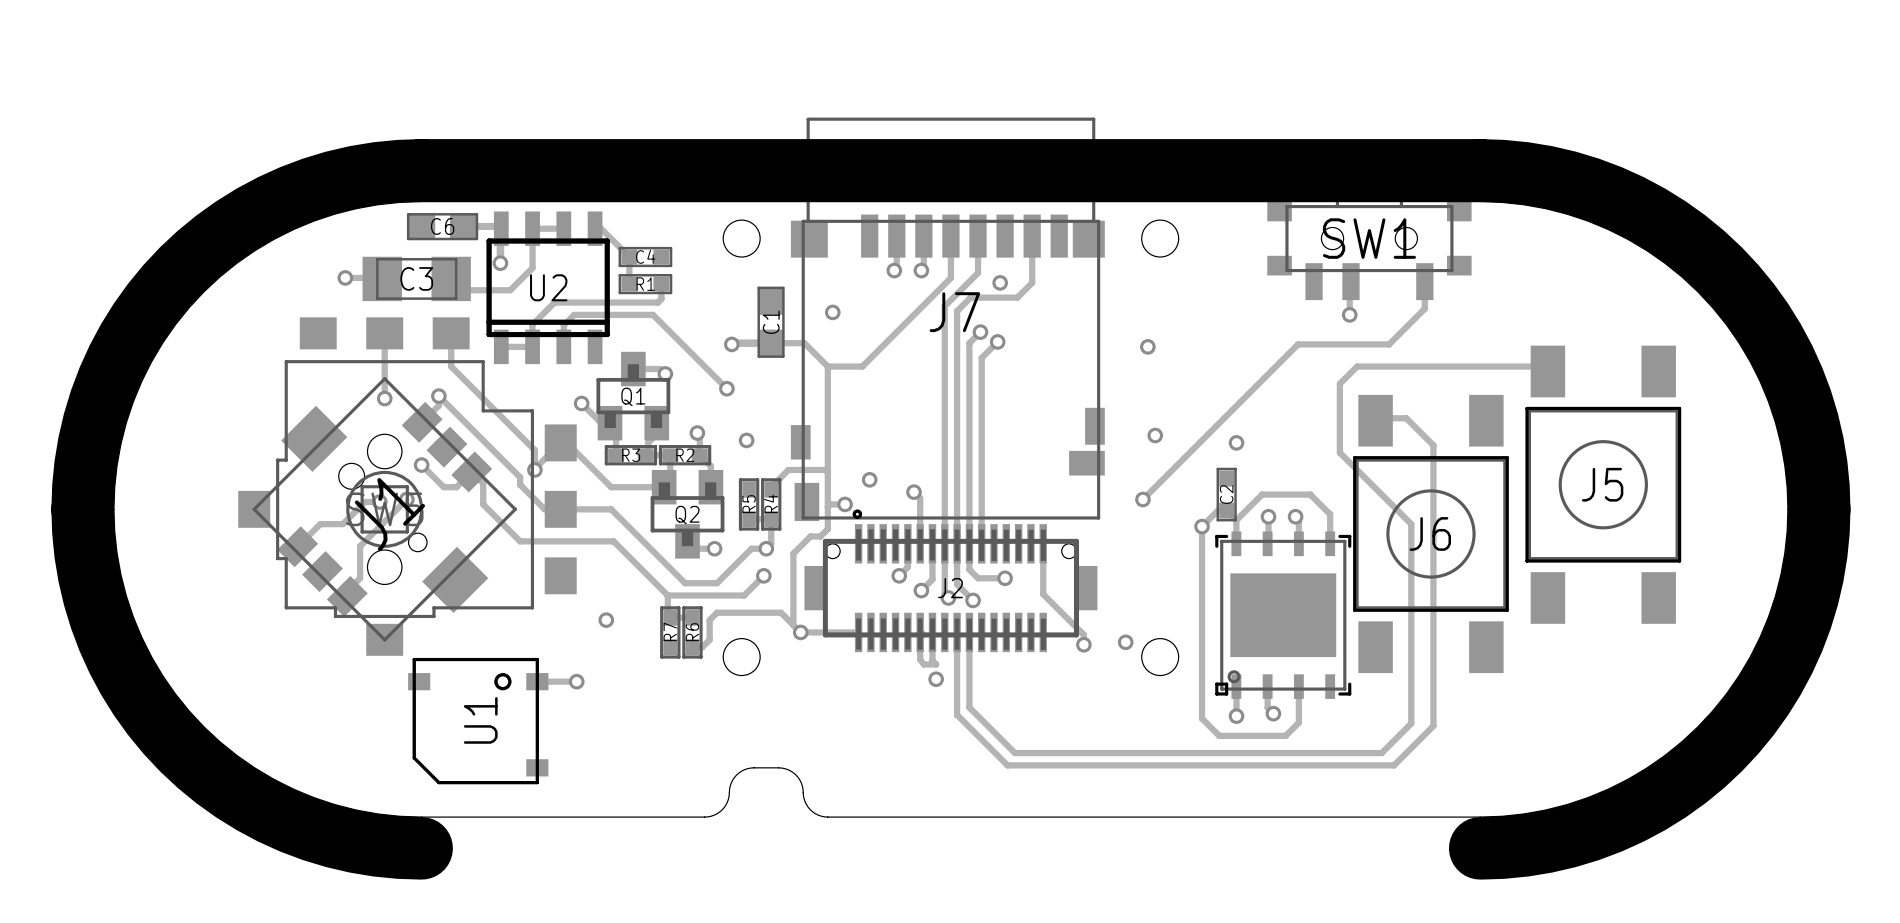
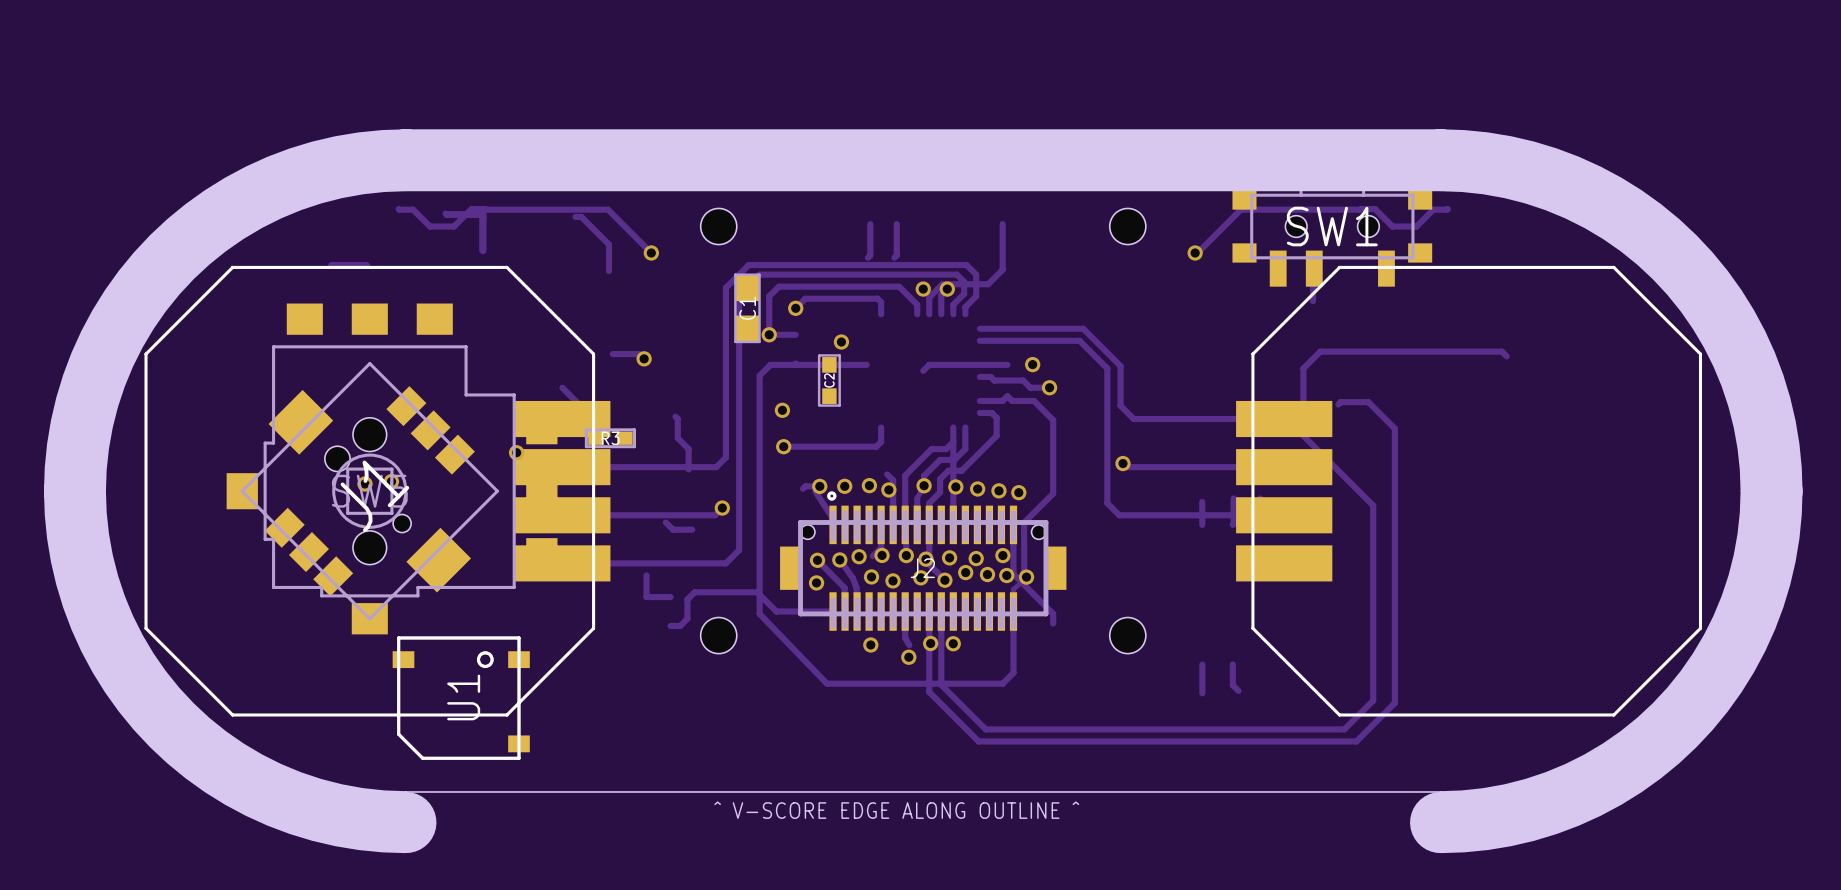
track: none -> (398, 209) (413, 209) (429, 226) (454, 226) (471, 209) (608, 209) (651, 252)
track: none -> (1447, 209) (1433, 209) (1416, 226) (1392, 226) (1375, 209) (1240, 209) (1197, 252) (1195, 252)
C6: (442, 226) -> none
track: (563, 228) (532, 228) (532, 267) (510, 290) (469, 290) (451, 278) -> none
track: (950, 236) (950, 277) (862, 366) (827, 366) -> none
track: (978, 236) (978, 273) (944, 306) (944, 318) -> (795, 334) (769, 334) (769, 296) (778, 286) (899, 286) (917, 304)
C4: (645, 257) -> none
via: (500, 263) -> none
via: none -> (651, 252)
via: none -> (1195, 252)
via: (894, 270) -> none
via: (921, 270) -> none
via: (345, 277) -> none
C3: (416, 278) -> none
track: (1424, 281) (1424, 308) (1389, 344) (1298, 344) (1142, 499) -> none
via: (1000, 282) -> none
R1: (645, 284) -> none
track: (661, 284) (661, 299) (657, 302) (554, 302) (532, 324) (532, 346) -> none
U2: (548, 287) -> none
via: none -> (923, 289)
track: none -> (947, 289) (941, 295) (941, 314)
via: none -> (947, 289)
via position: (832, 312) -> (795, 308)
via: (1349, 314) -> none
J7: (947, 319) -> none
track: none -> (795, 308) (805, 298) (877, 298) (881, 302) (881, 314)
track: (944, 328) (944, 516) -> (965, 427) (965, 449) (954, 459) (940, 459) (924, 475) (924, 485) (917, 498)
track: (957, 328) (957, 521) -> (979, 413) (991, 413) (996, 417) (996, 435) (961, 470) (948, 470) (940, 479) (940, 492) (929, 503)
track: none -> (965, 314) (965, 307) (976, 296) (976, 274) (966, 265) (748, 265) (725, 287) (725, 457) (716, 467) (562, 467)
track: (980, 332) (969, 343) (969, 569) (978, 578) (1005, 578) -> none
via: (980, 332) -> none
track: (384, 333) (384, 398) -> none
track: (451, 333) (451, 366) (534, 450) (534, 469) -> none
track: (997, 341) (981, 357) (981, 444) -> none
via: (997, 341) -> none
track: none -> (979, 328) (1083, 328) (1120, 366) (1120, 405) (1133, 419) (1284, 419)
track: (731, 344) (804, 343) (827, 366) -> none
via: (731, 344) -> none
track: (501, 346) (532, 346) -> none
track: (563, 346) (563, 325) (574, 314) (653, 314) (726, 388) -> none
via: (1147, 346) -> none
via: none -> (769, 334)
track: none -> (979, 340) (1079, 340) (1107, 368) (1107, 503) (1119, 515) (1284, 515)
via: none -> (841, 342)
track: (827, 366) (827, 529) (820, 536) (810, 536) (793, 553) (793, 625) -> none
via: none -> (1032, 364)
track: none -> (866, 364) (770, 364) (759, 375) (759, 613) (827, 683) (1002, 683) (1013, 672) (1013, 589) (1026, 577) (1024, 575) (1024, 522) (1053, 493) (1053, 420) (1033, 400) (1012, 400) (1007, 396) (1002, 400) (979, 400)
track: none -> (1007, 364) (929, 364) (923, 370)
via: (726, 388) -> none
track: none -> (979, 376) (990, 376) (994, 380) (1023, 380) (1030, 387) (1049, 387)
via: (438, 396) -> none
Q1: (633, 396) -> none
via: (384, 398) -> none
via: (581, 403) -> none
via: none -> (1049, 387)
track: (422, 422) (438, 405) (438, 396) (520, 477) (520, 484) (544, 509) (611, 509) (685, 583) -> (562, 563) (663, 563)
track: (656, 423) (656, 434) (648, 442) (648, 452) (645, 455) (670, 455) (670, 481) (664, 487) (611, 487) (566, 442) (560, 442) (534, 468) -> none
via: none -> (782, 410)
via: (697, 433) -> none
via: (1155, 435) -> none
via: (746, 440) -> none
via: (1236, 442) -> none
track: none -> (881, 427) (881, 441) (876, 446) (783, 446)
R2: (685, 455) -> none
track: none -> (953, 441) (946, 449) (931, 449) (905, 475) (906, 555)
via: none -> (783, 446)
track: (421, 465) (443, 487) (456, 487) (471, 471) (483, 483) (483, 504) (520, 541) (613, 541) (667, 595) (744, 595) (763, 575) -> none
via: (421, 465) -> none
C2 footprint: [1216, 467, 1237, 522] -> [817, 354, 842, 407]
track: (827, 472) (825, 469) (788, 469) (771, 487) (771, 489) -> none
via: (869, 479) -> none
track: none -> (1122, 463) (1126, 467) (1284, 467)
J5: (1603, 484) -> none
via: (914, 492) -> none
track: (406, 499) (360, 546) (360, 578) (347, 591) (347, 596) -> none
via position: (1142, 499) -> (1122, 463)
track: (379, 501) (365, 501) (342, 524) (320, 524) (297, 546) -> none
via: none -> (869, 485)
via: none -> (924, 485)
R5: (749, 504) -> none
R4: (771, 504) -> none
via: none -> (844, 486)
via: none -> (955, 486)
via: none -> (977, 488)
via: none -> (888, 489)
part: none -> (377, 491)
track: none -> (815, 491) (832, 518) (833, 524)
via: none -> (998, 490)
part: none -> (1469, 491)
via: none -> (1018, 492)
Q2: (687, 514) -> none
via: (1268, 516) -> none
via: (1295, 516) -> none
track: (749, 519) (771, 519) (771, 543) (766, 548) (751, 548) (717, 583) -> (953, 314) (953, 304) (964, 293) (964, 281) (956, 274) (759, 274) (739, 295) (739, 550) (725, 563) (694, 563)
track: none -> (722, 508) (715, 515) (562, 515)
via: none -> (722, 508)
via: (1202, 526) -> none
J6: (1430, 533) -> none
track: (932, 543) (932, 579) (921, 590) -> none
track: (944, 543) (944, 594) (948, 597) -> none
track: (1330, 543) (1330, 514) (1310, 494) (1262, 494) (1236, 520) (1226, 510) (1218, 510) (1202, 526) (1202, 718) (1219, 735) (1285, 735) (1298, 722) (1298, 686) -> none
via: (714, 548) -> none
via: (766, 548) -> none
via: (763, 575) -> none
via: (899, 575) -> none
via: none -> (882, 555)
via: none -> (906, 555)
via: none -> (1002, 555)
via: none -> (859, 556)
via: none -> (949, 557)
via: none -> (925, 559)
track: none -> (839, 559) (852, 578) (856, 587) (857, 611)
via: none -> (839, 559)
track: none -> (817, 560) (844, 587) (845, 611)
via: none -> (817, 560)
via: (921, 590) -> none
via: none -> (965, 572)
via: none -> (987, 574)
via: none -> (1006, 575)
via: none -> (871, 576)
via: none -> (1026, 577)
via: none -> (893, 580)
via: none -> (816, 582)
part: (1283, 615) -> none
via: (606, 620) -> none
R7: (670, 632) -> none
R6: (692, 632) -> none
via: (800, 632) -> none
track: (923, 634) (921, 632) (920, 634) (920, 659) (923, 664) (936, 664) (932, 659) -> (909, 645) (905, 638)
via: (1125, 642) -> none
via: (1083, 644) -> none
via: none -> (930, 643)
via: none -> (953, 643)
via: none -> (870, 644)
track: (537, 681) (576, 681) -> none
via: (576, 681) -> none
via: (1273, 713) -> none
via: (1236, 716) -> none
board edge: (704, 817) (714, 815) (722, 809) (727, 801) (730, 786) (734, 777) (744, 769) (753, 767) (781, 768) (790, 771) (801, 783) (804, 798) (808, 807) (818, 815) (827, 817) -> (682, 791) (802, 791)
text: none -> ^ V-SCORE EDGE ALONG OUTLINE ^ (896, 810)

